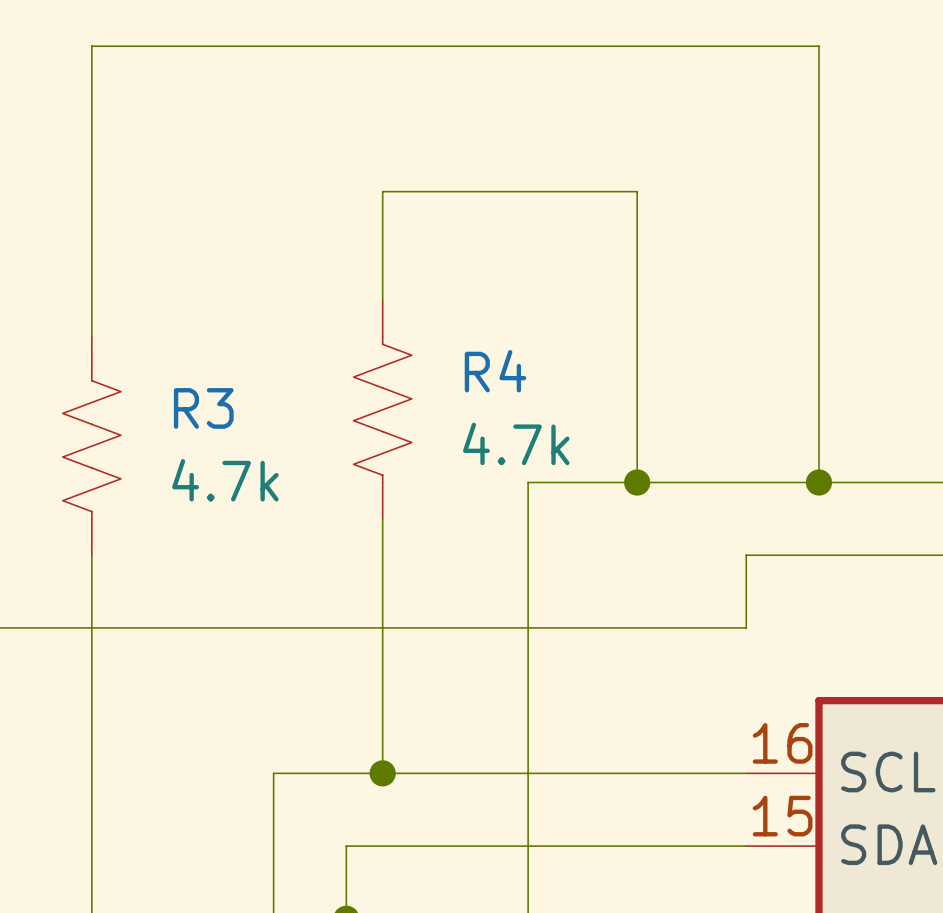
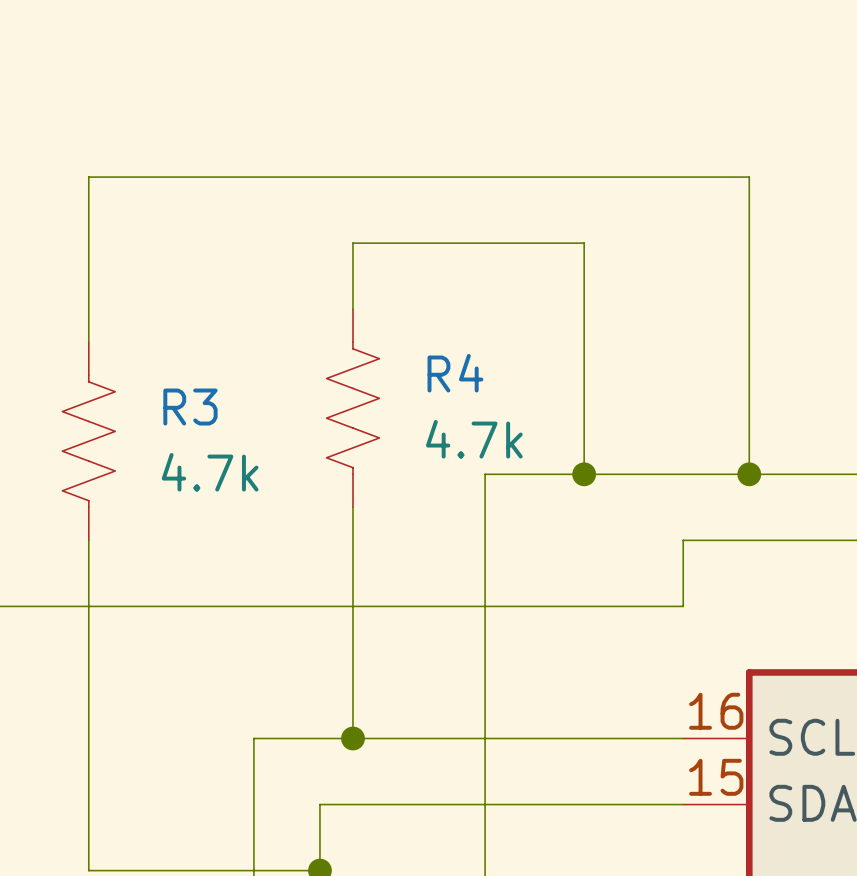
wire: (91, 155) (91, 46) (818, 46) (818, 155) -> (88, 177) (749, 177)
wire: (382, 228) (382, 191) (637, 191) (637, 228) -> (352, 243) (584, 243)

